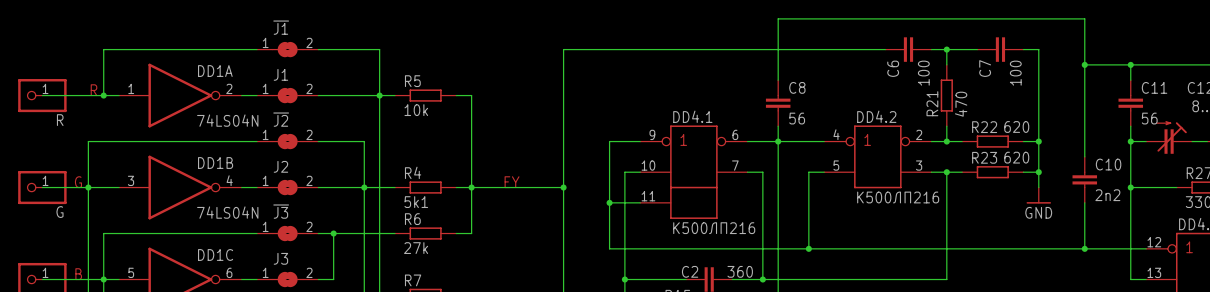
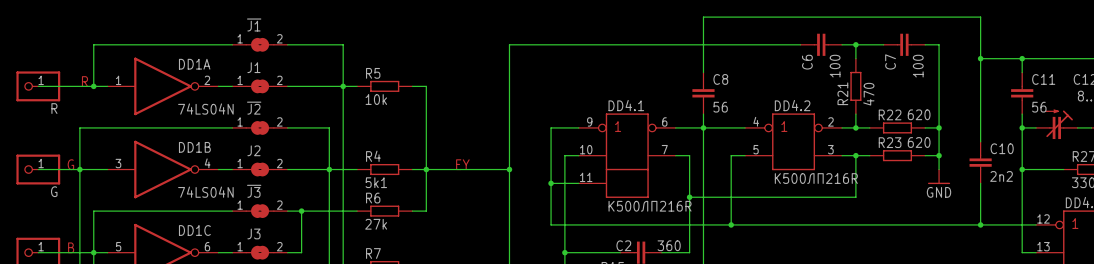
DD4.2 value: К500ЛП216 (898, 197) -> К500ЛП216R (816, 178)
junction: none -> (689, 197)
wire: (946, 218) (946, 279) (762, 279) -> (855, 197) (689, 197)
DD4.1 value: К500ЛП216 (714, 228) -> К500ЛП216R (650, 206)
junction: (762, 279) -> none

